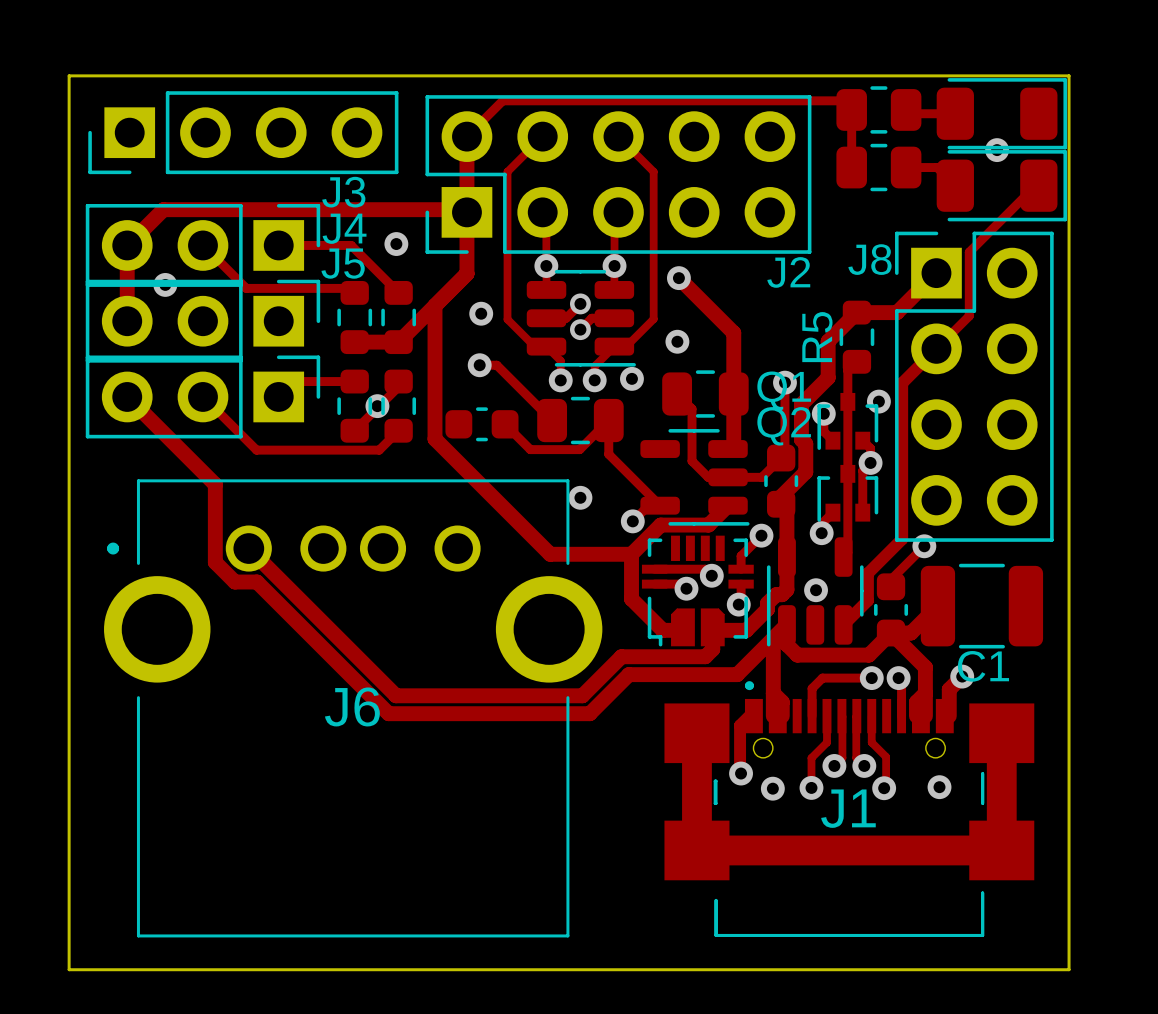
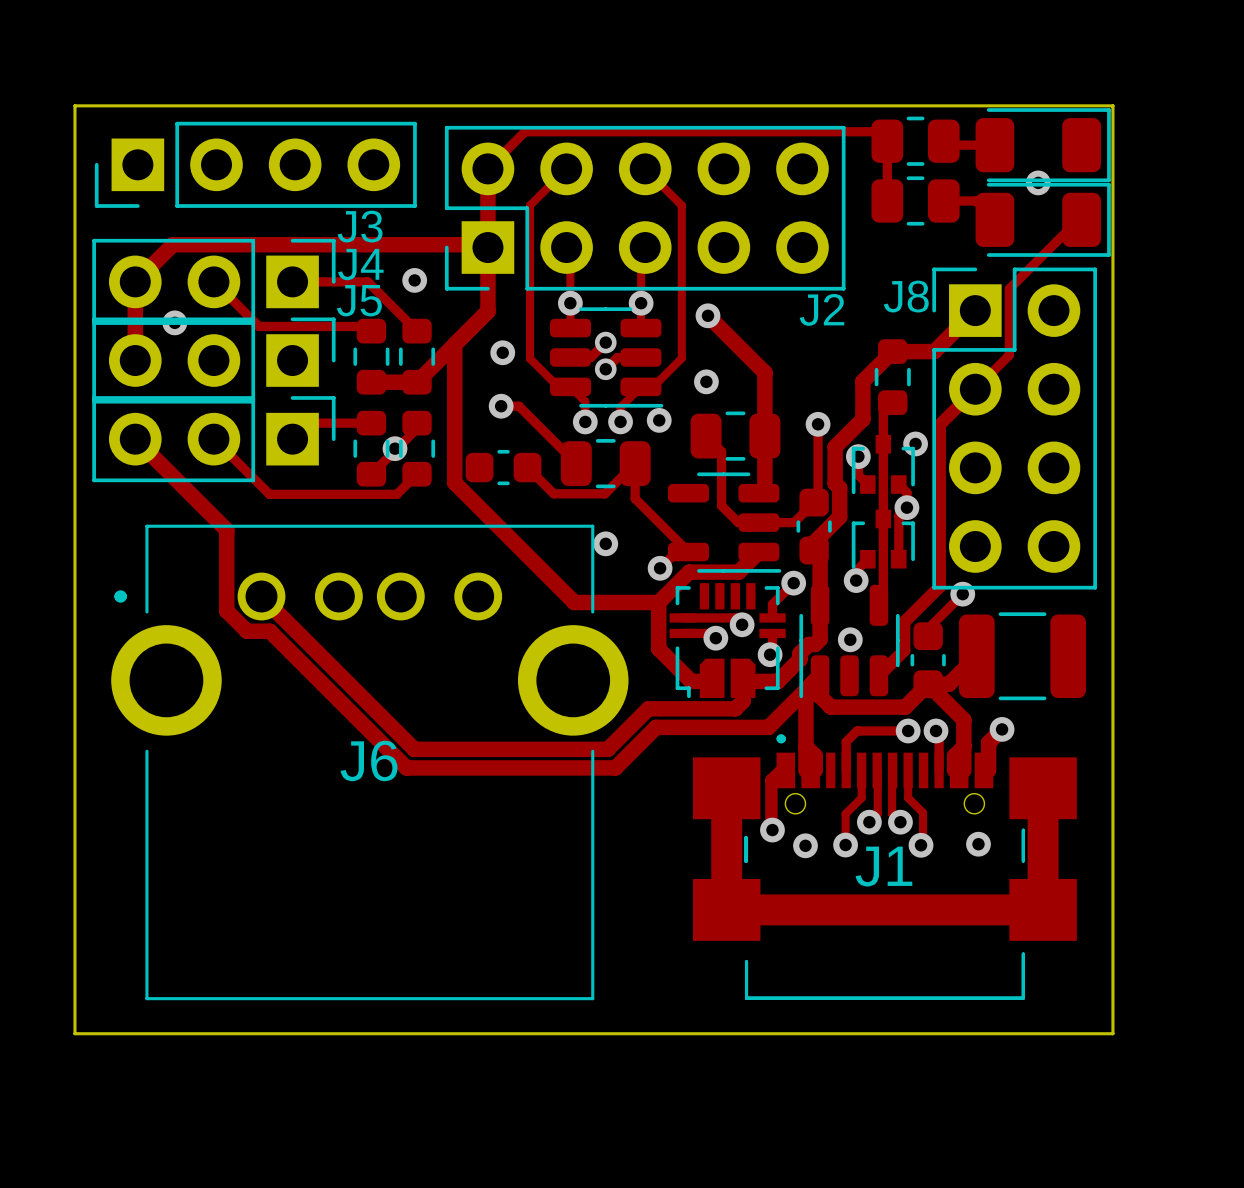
R5 name: R5 (817, 337) -> none
Q1 name: Q1 (784, 390) -> none
Q2 name: Q2 (784, 426) -> none
C1 name: C1 (983, 666) -> none

